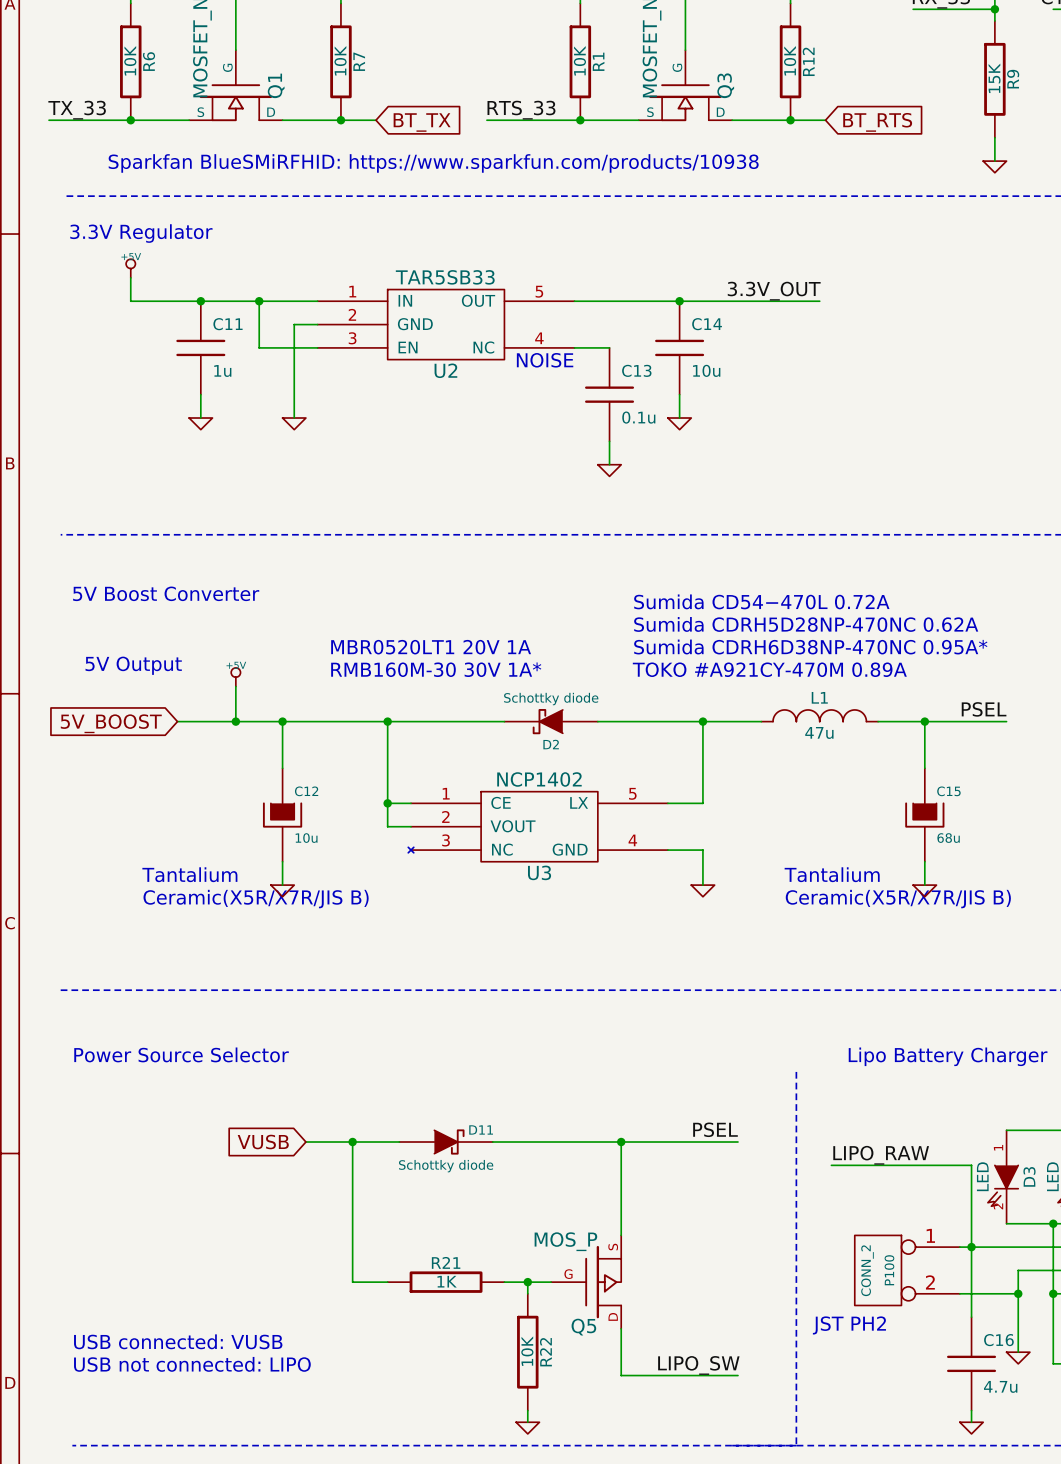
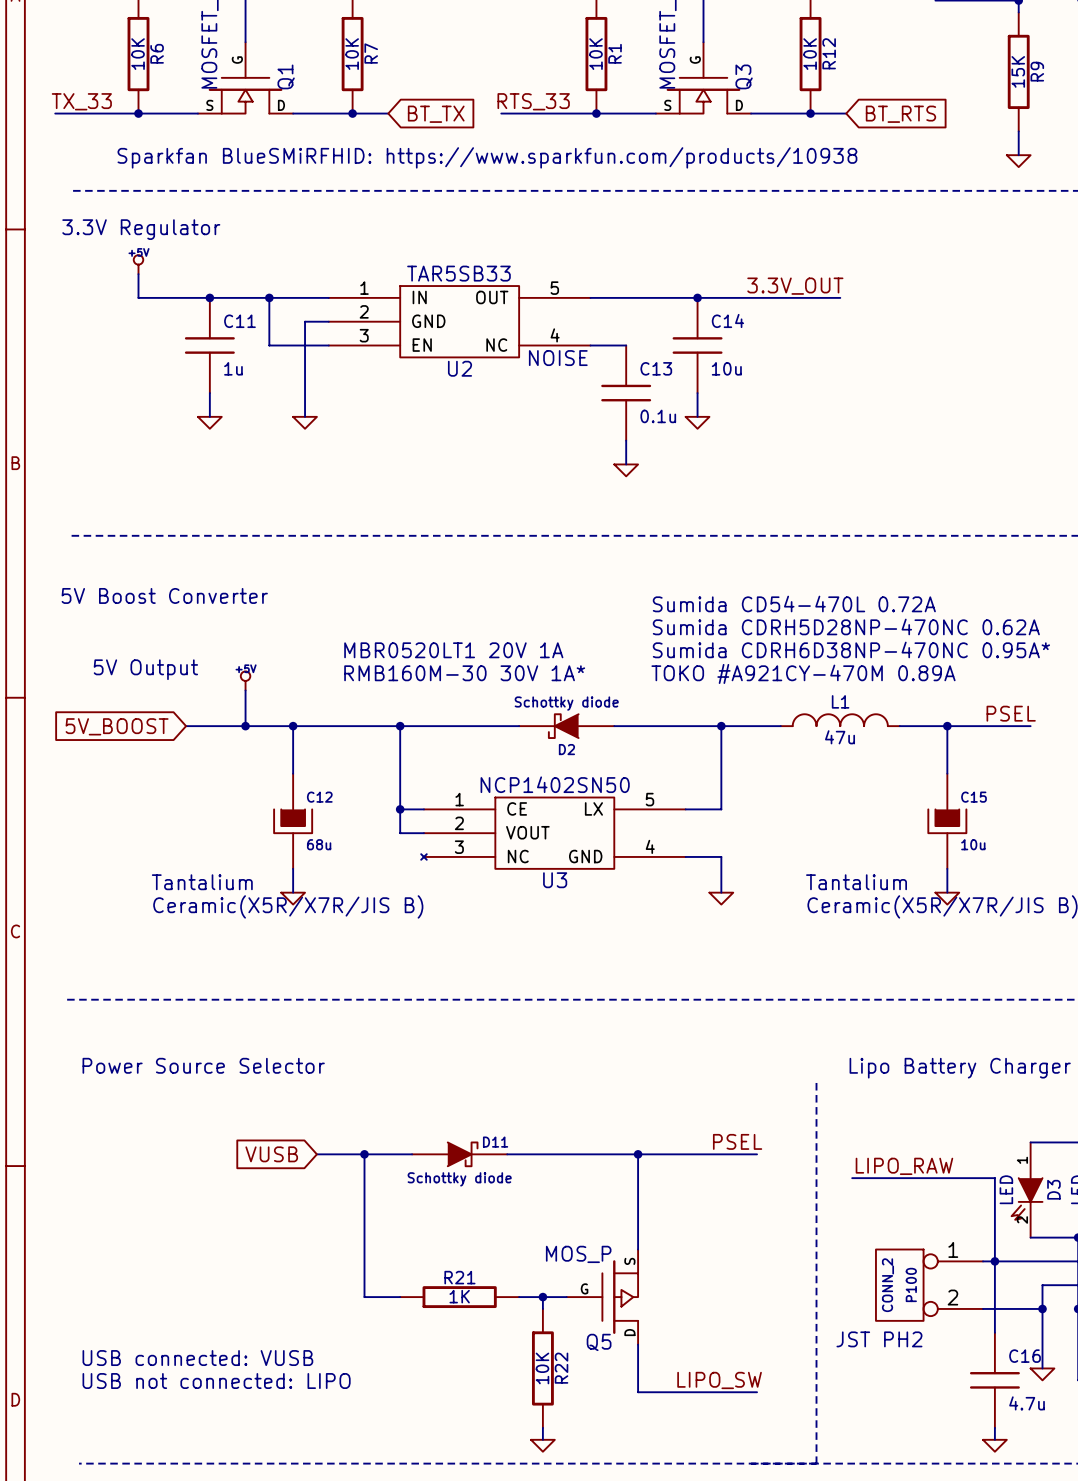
U3 value: NCP1402 (539, 779) -> NCP1402SN50 (555, 784)
C12 value: 10u (306, 838) -> 68u (319, 844)
C15 value: 68u (948, 838) -> 10u (973, 844)

